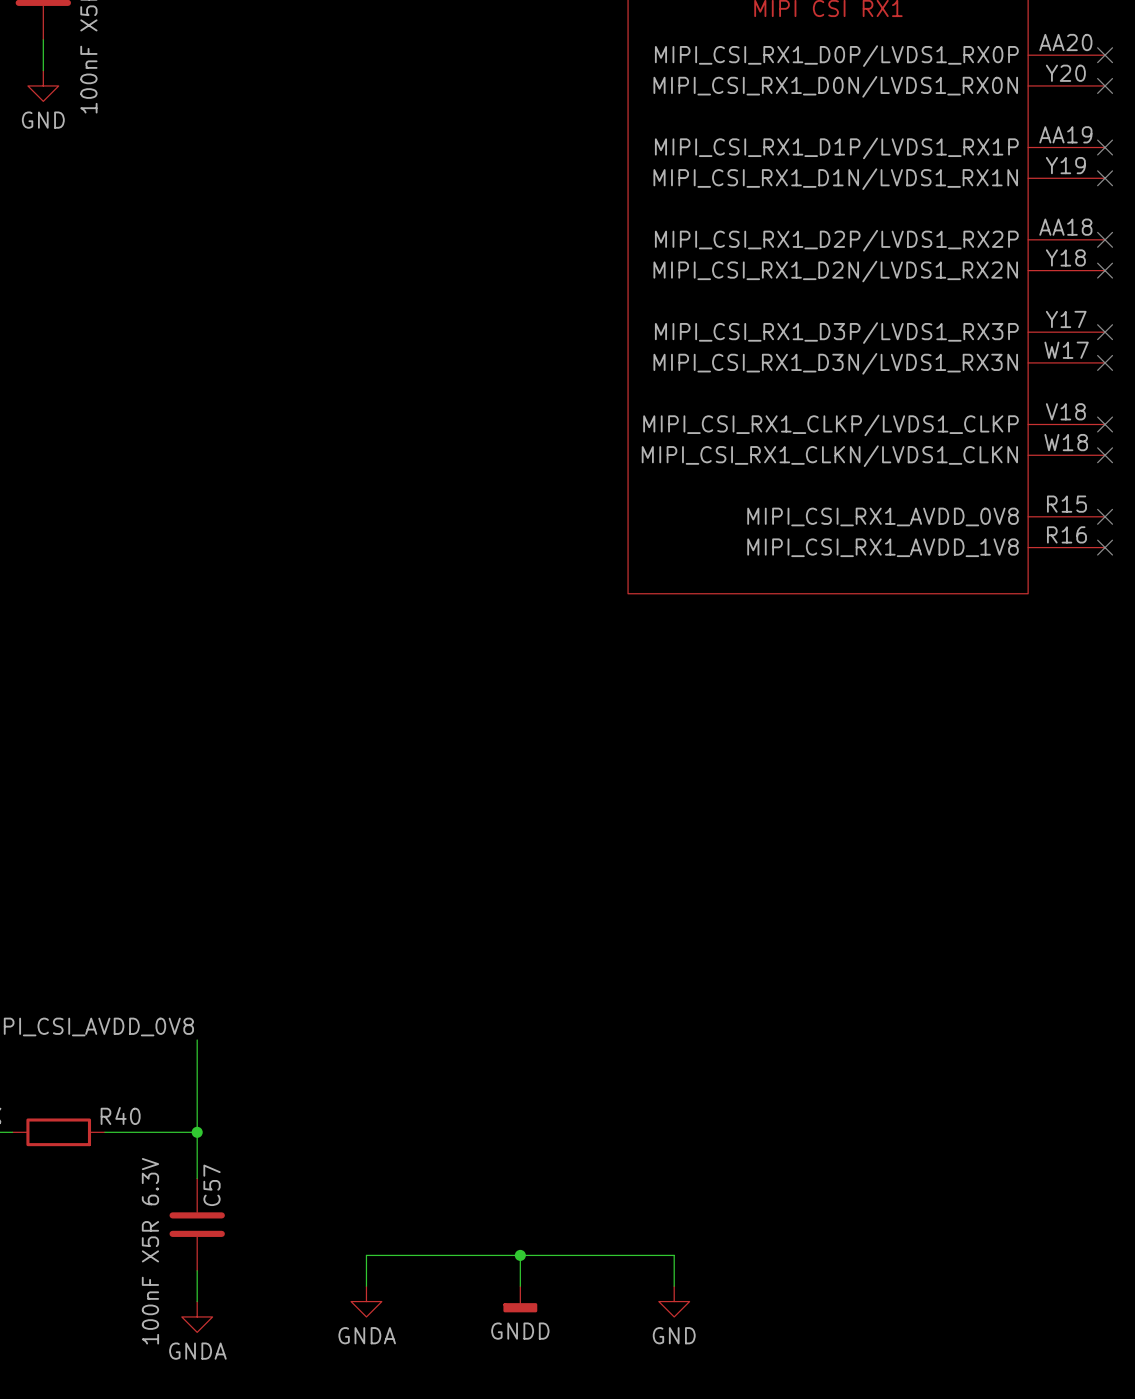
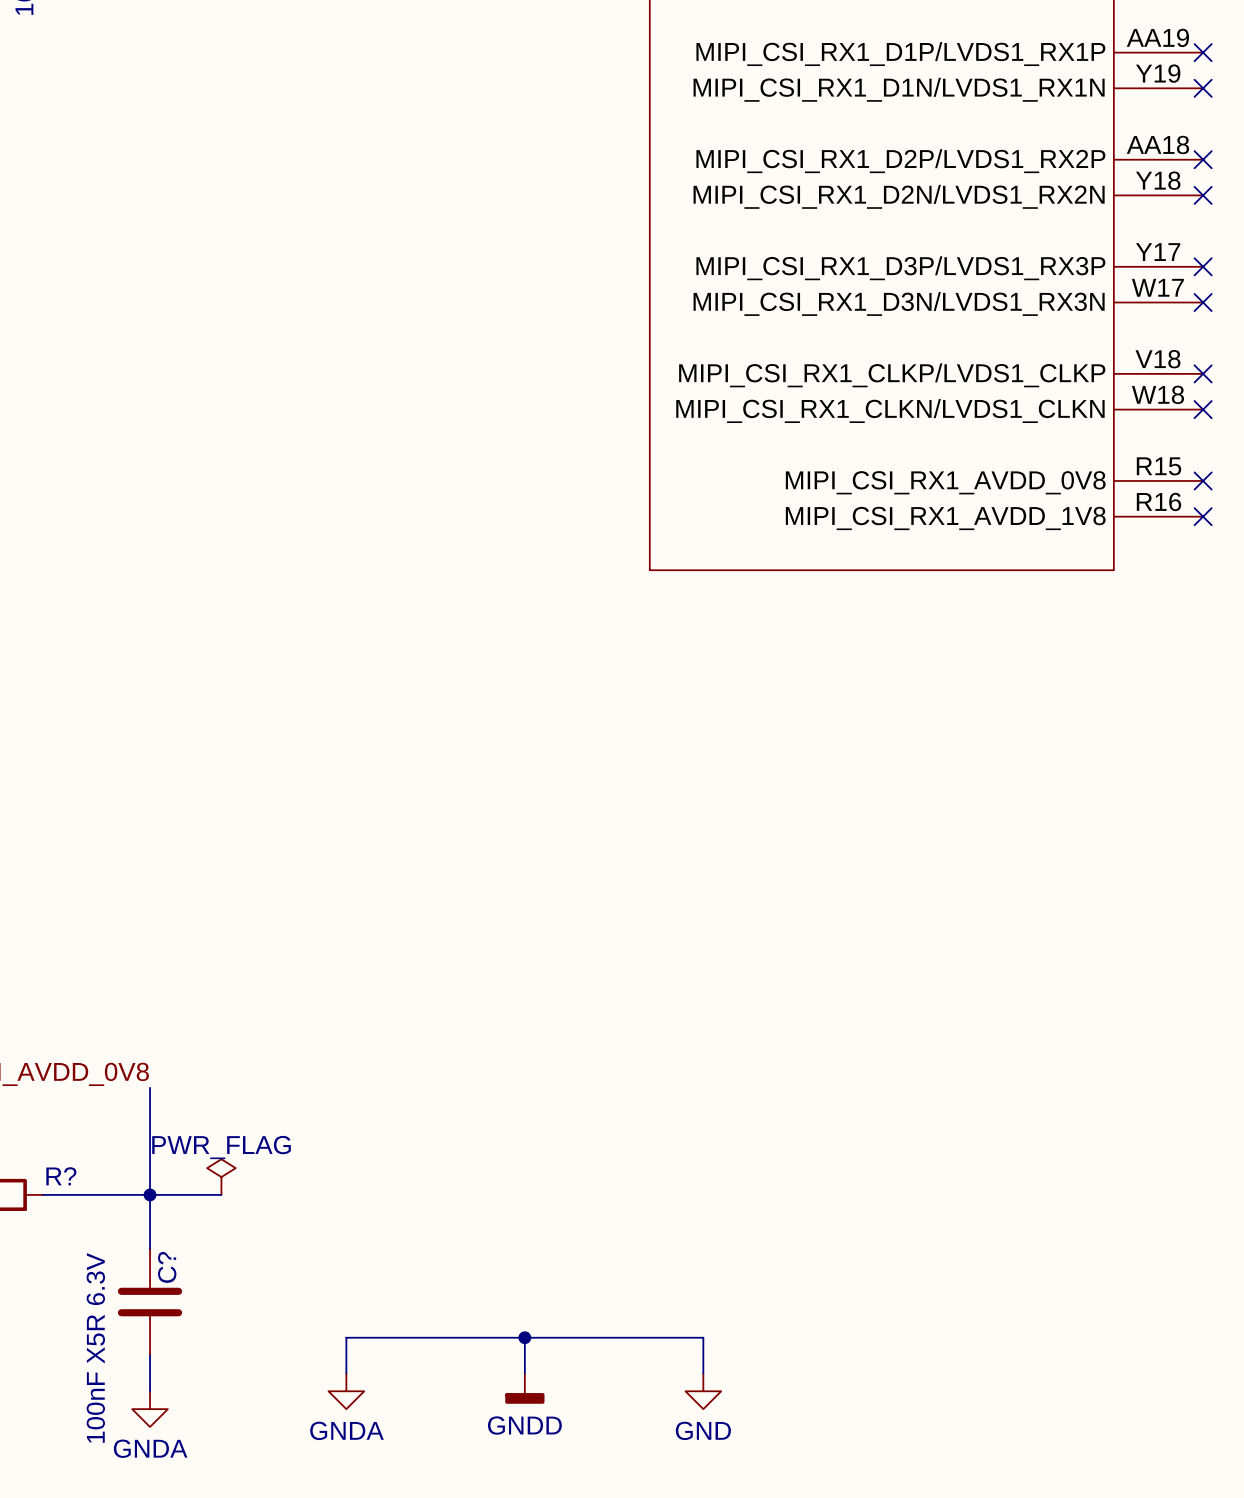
R40 name: R40 (120, 1115) -> R? (61, 1176)
power symbol: none -> PWR_FLAG (221, 1177)
wire: none -> (150, 1194) (221, 1194)
C57 name: C57 (212, 1185) -> C? (167, 1267)

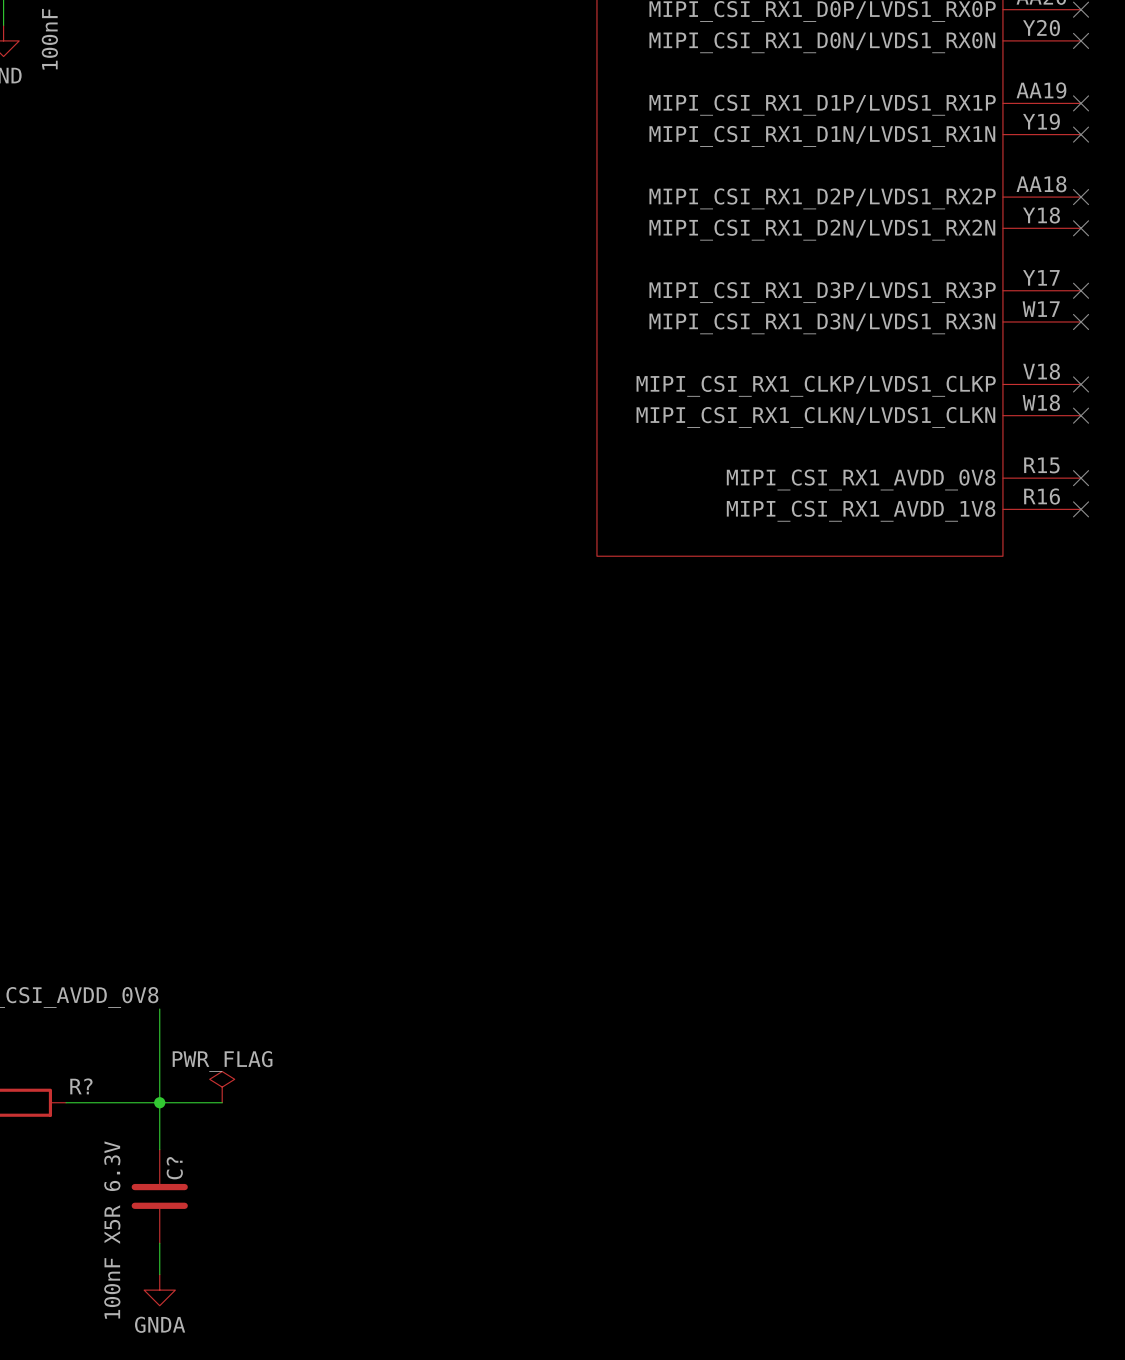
wire: (524, 1337) (524, 1373) -> none
junction: (524, 1337) -> none
wire: (346, 1373) (346, 1337) (703, 1337) (703, 1373) -> none
power symbol: GNDD (524, 1388) -> none
power symbol: GNDA (346, 1391) -> none
power symbol: GND (703, 1391) -> none

